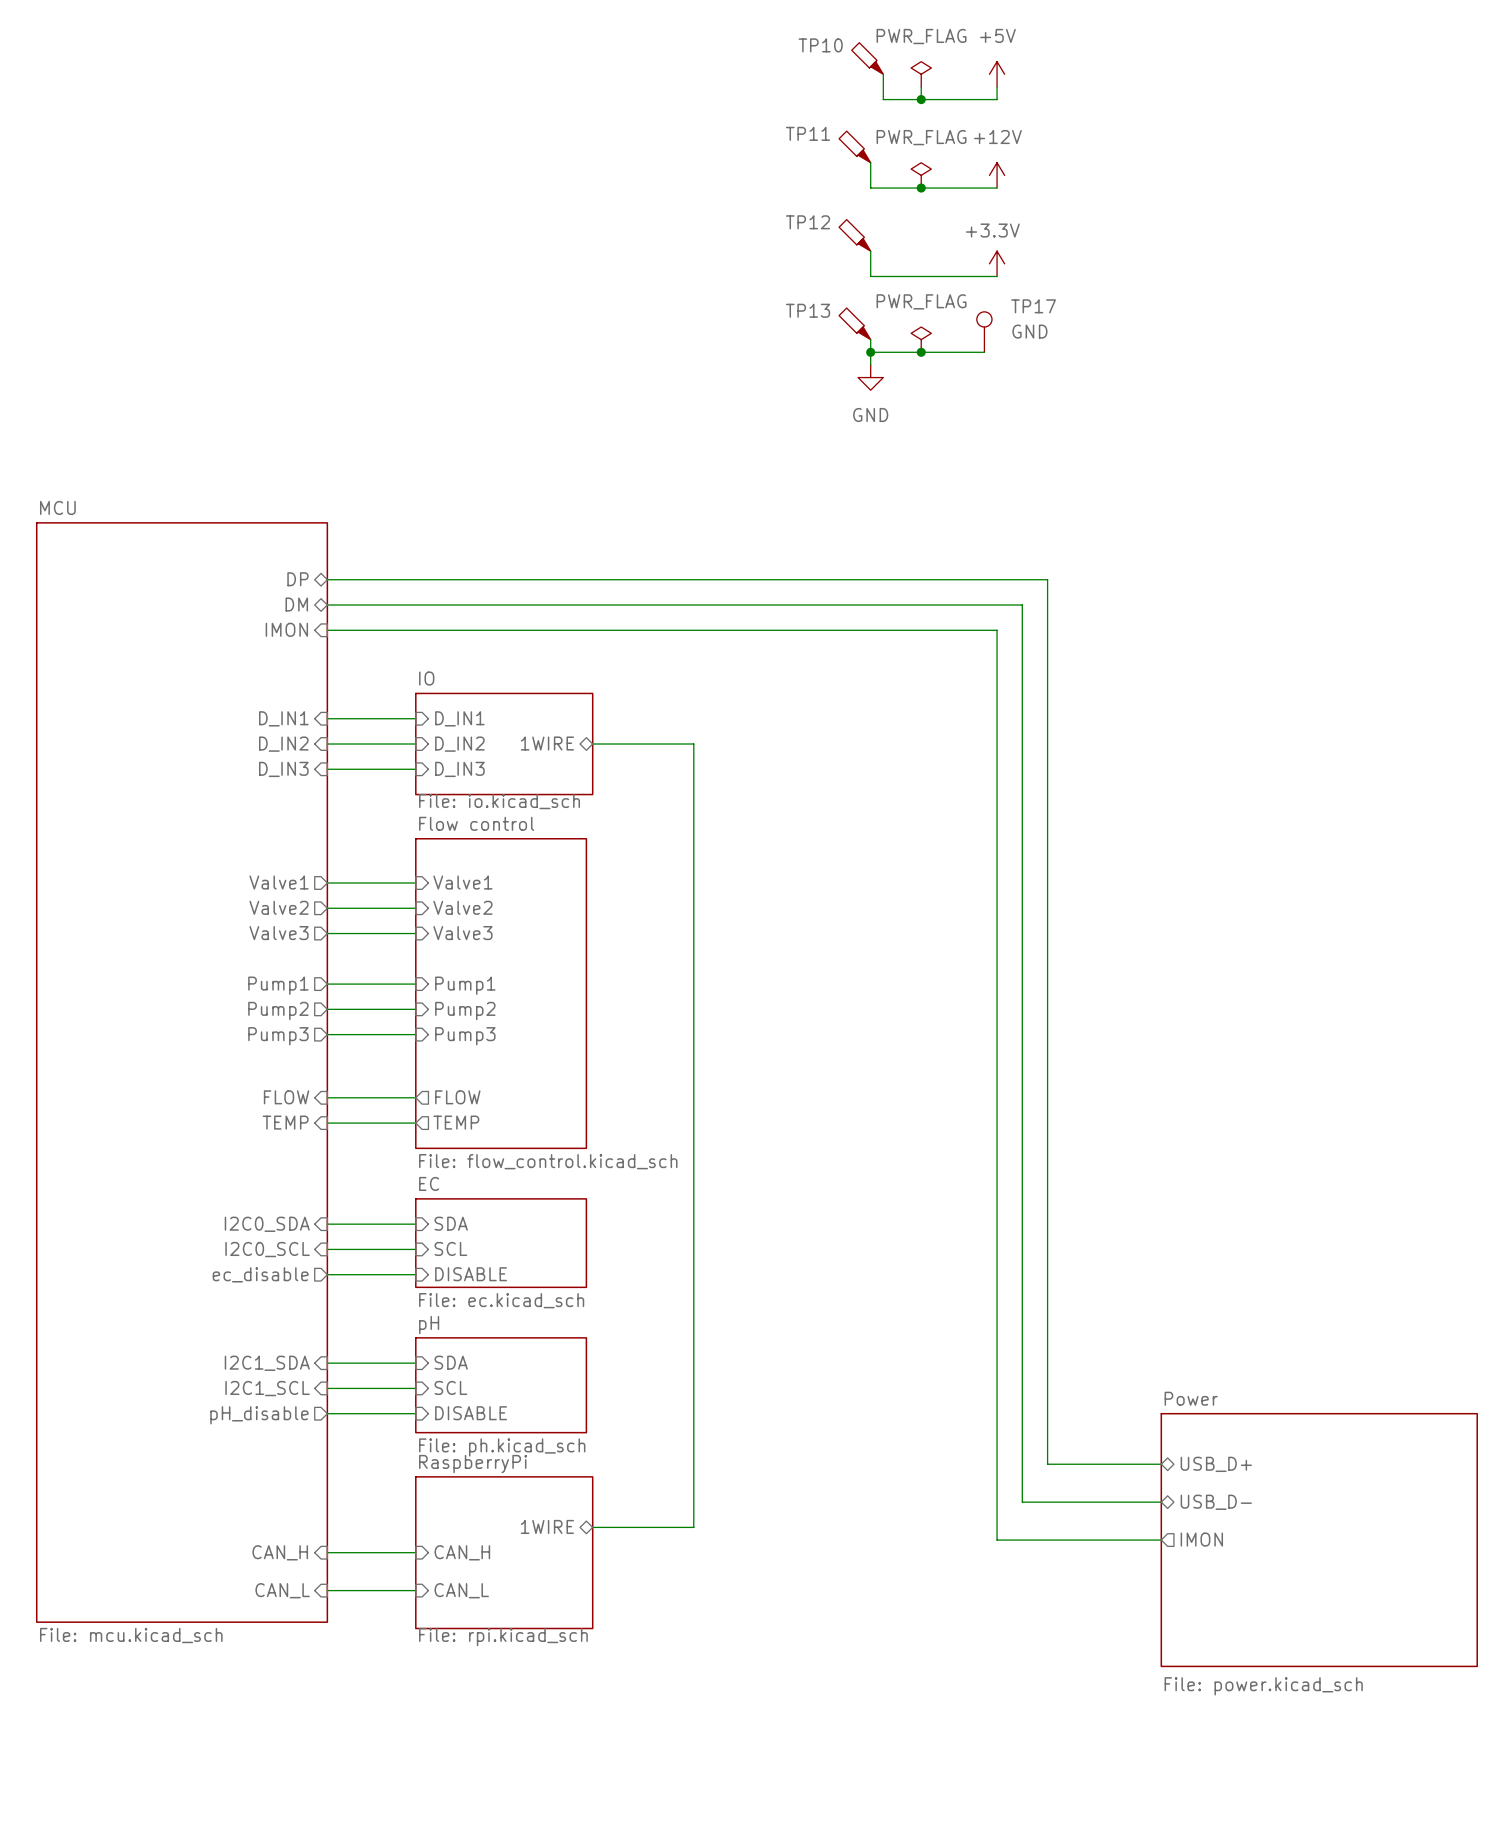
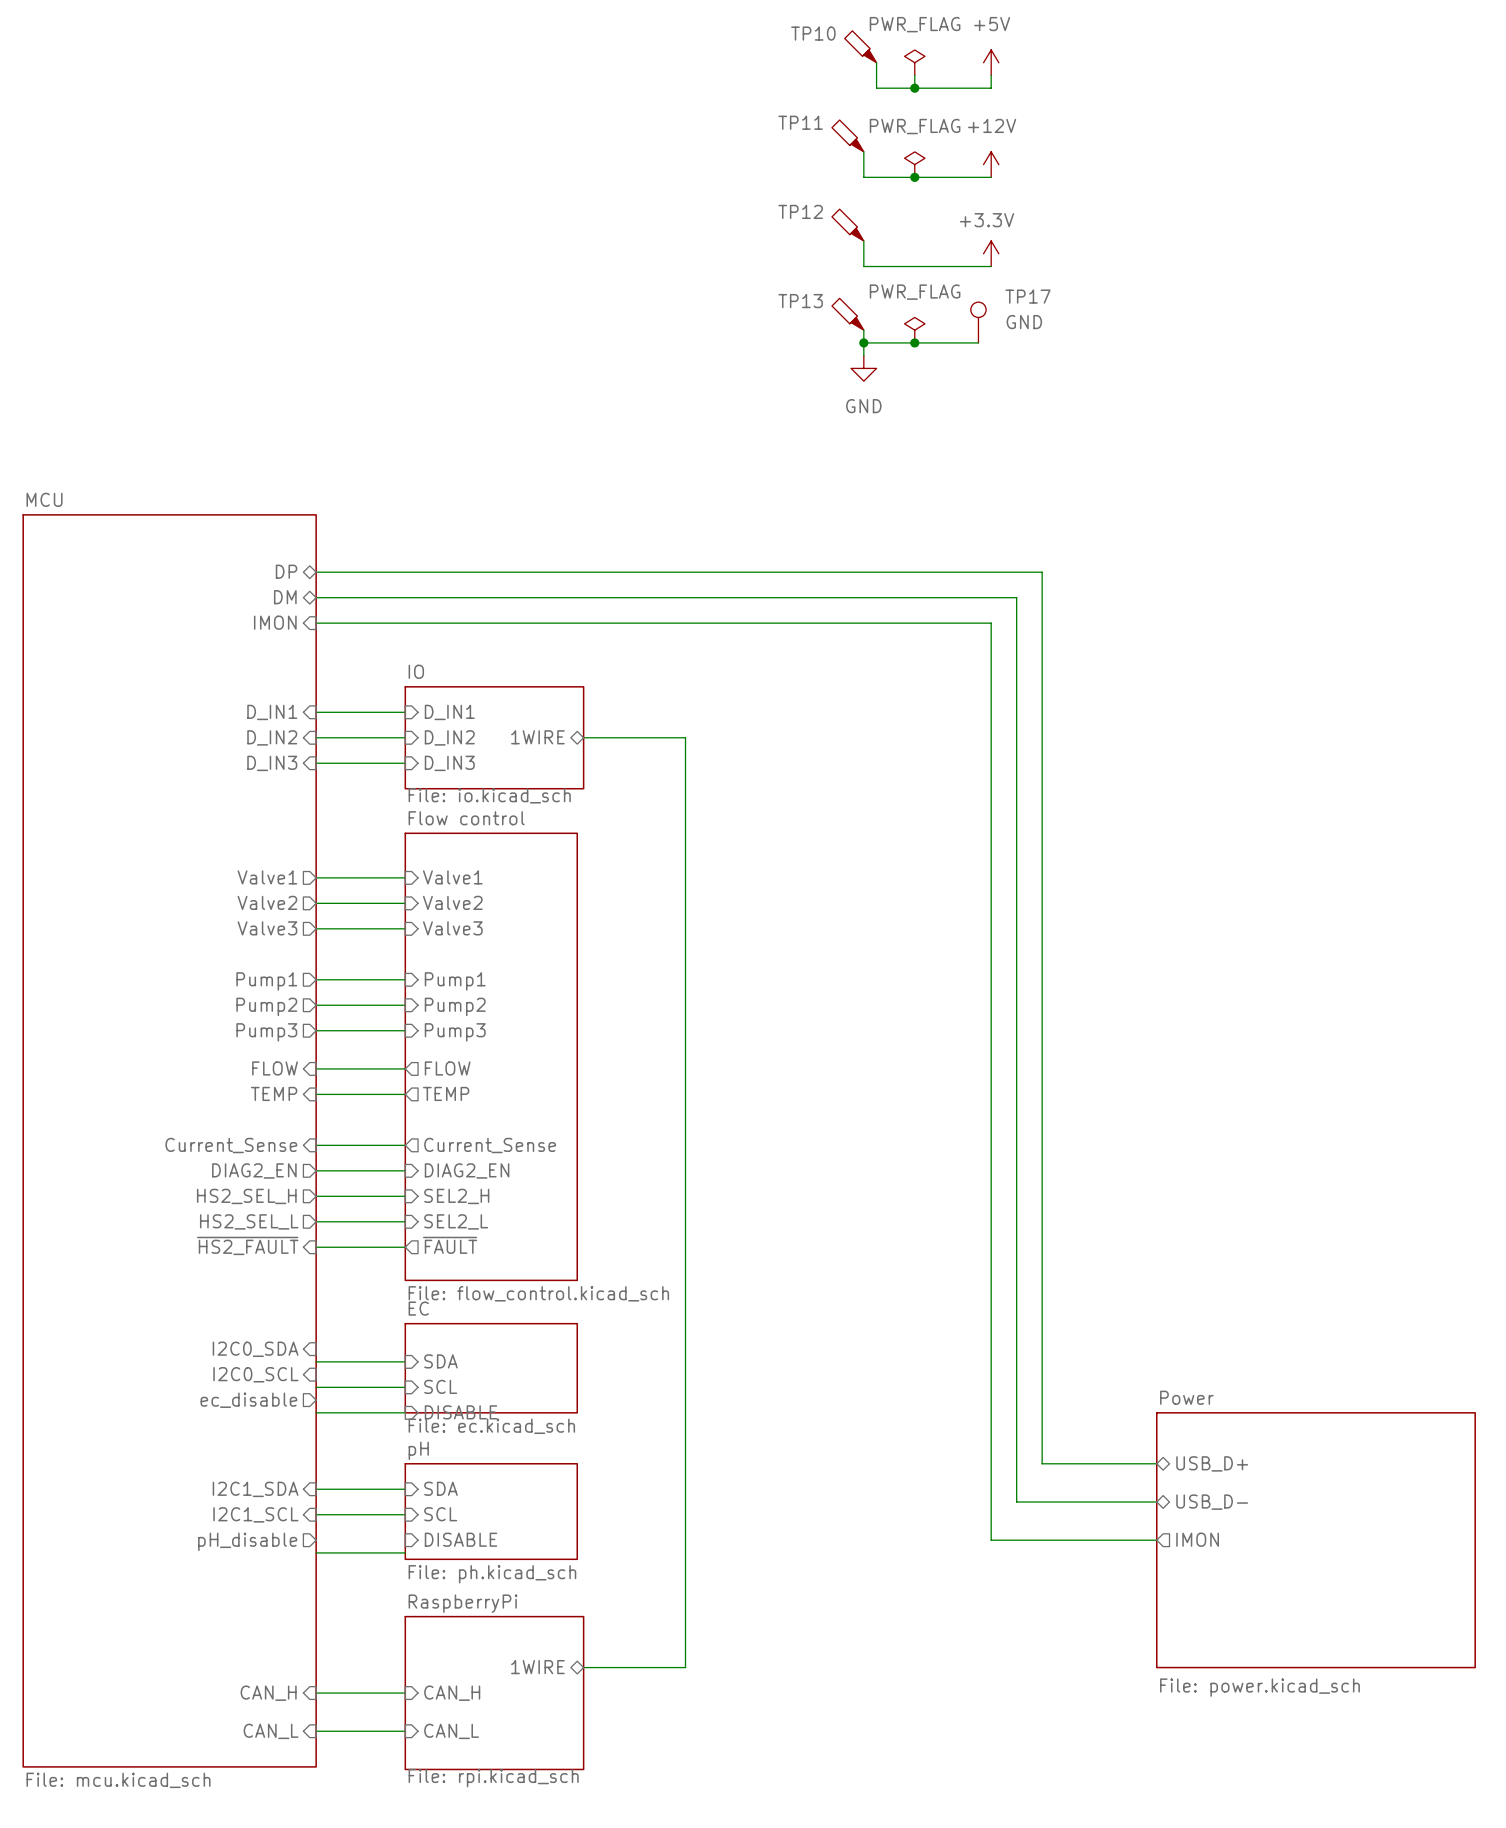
sheet Flow control: File: flow_control.kicad_sch (501, 993) -> none
sheet Flow control: none -> File: flow_control.kicad_sch (491, 1056)
sheet MCU: File: mcu.kicad_sch (182, 1072) -> none
sheet pin: none -> FLOW (275, 1068)
wire: none -> (316, 1068) (405, 1068)
sheet pin: none -> FLOW (447, 1068)
sheet pin: FLOW (286, 1097) -> TEMP (274, 1093)
sheet pin: FLOW (457, 1097) -> TEMP (446, 1093)
sheet pin: TEMP (285, 1122) -> none
sheet pin: TEMP (456, 1122) -> none
wire: (327, 1123) (415, 1123) -> (316, 1145) (405, 1145)
sheet MCU: none -> File: mcu.kicad_sch (169, 1140)
sheet pin: none -> Current_Sense (231, 1145)
sheet pin: none -> Current_Sense (490, 1145)
sheet pin: none -> DIAG2_EN (254, 1170)
wire: none -> (316, 1170) (405, 1170)
sheet pin: none -> DIAG2_EN (467, 1170)
sheet pin: none -> HS2_SEL_H (246, 1196)
sheet pin: none -> SEL2_H (456, 1196)
sheet pin: SDA (451, 1223) -> SEL2_L (456, 1221)
sheet pin shape: input (267, 1224) -> output (249, 1221)
sheet pin: I2C0_SDA (267, 1224) -> HS2_SEL_L (249, 1221)
sheet EC position: (501, 1243) -> (491, 1368)
sheet pin shape: input (450, 1248) -> output (450, 1245)
sheet pin: SCL (450, 1248) -> ~{FAULT} (450, 1245)
sheet pin: I2C0_SCL (267, 1249) -> ~{HS2_FAULT} (247, 1245)
sheet pin position: ec_disable (260, 1274) -> ec_disable (248, 1400)
wire: (327, 1274) (415, 1274) -> (316, 1196) (405, 1196)
sheet pin: DISABLE (471, 1274) -> none
sheet pin: none -> I2C0_SDA (255, 1349)
sheet pin position: I2C1_SDA (267, 1363) -> I2C1_SDA (255, 1489)
sheet pin: none -> I2C0_SCL (255, 1374)
sheet pH position: (501, 1385) -> (491, 1511)
sheet pin position: I2C1_SCL (267, 1388) -> I2C1_SCL (255, 1514)
sheet pin position: pH_disable (259, 1415) -> pH_disable (247, 1541)
wire: none -> (316, 1489) (405, 1489)
sheet pin: none -> SDA (440, 1488)
sheet pin: none -> SCL (440, 1514)
sheet pin position: 1WIRE (547, 1526) -> 1WIRE (537, 1667)
wire: (592, 1527) (693, 1527) -> (583, 1667) (685, 1667) (685, 1527)
sheet pin: none -> DISABLE (460, 1539)
sheet pin: CAN_H (280, 1552) -> none
sheet pin: CAN_H (462, 1552) -> none
sheet RaspberryPi position: (504, 1552) -> (494, 1693)
sheet pin: CAN_L (282, 1590) -> none
wire: (327, 1590) (415, 1590) -> (316, 1514) (405, 1514)
sheet pin: CAN_L (461, 1590) -> none
sheet pin: none -> CAN_H (268, 1693)
wire: none -> (316, 1693) (405, 1693)
sheet pin: none -> CAN_H (452, 1693)
sheet pin: none -> CAN_L (271, 1731)
wire: none -> (316, 1731) (405, 1731)
sheet pin: none -> CAN_L (451, 1731)

